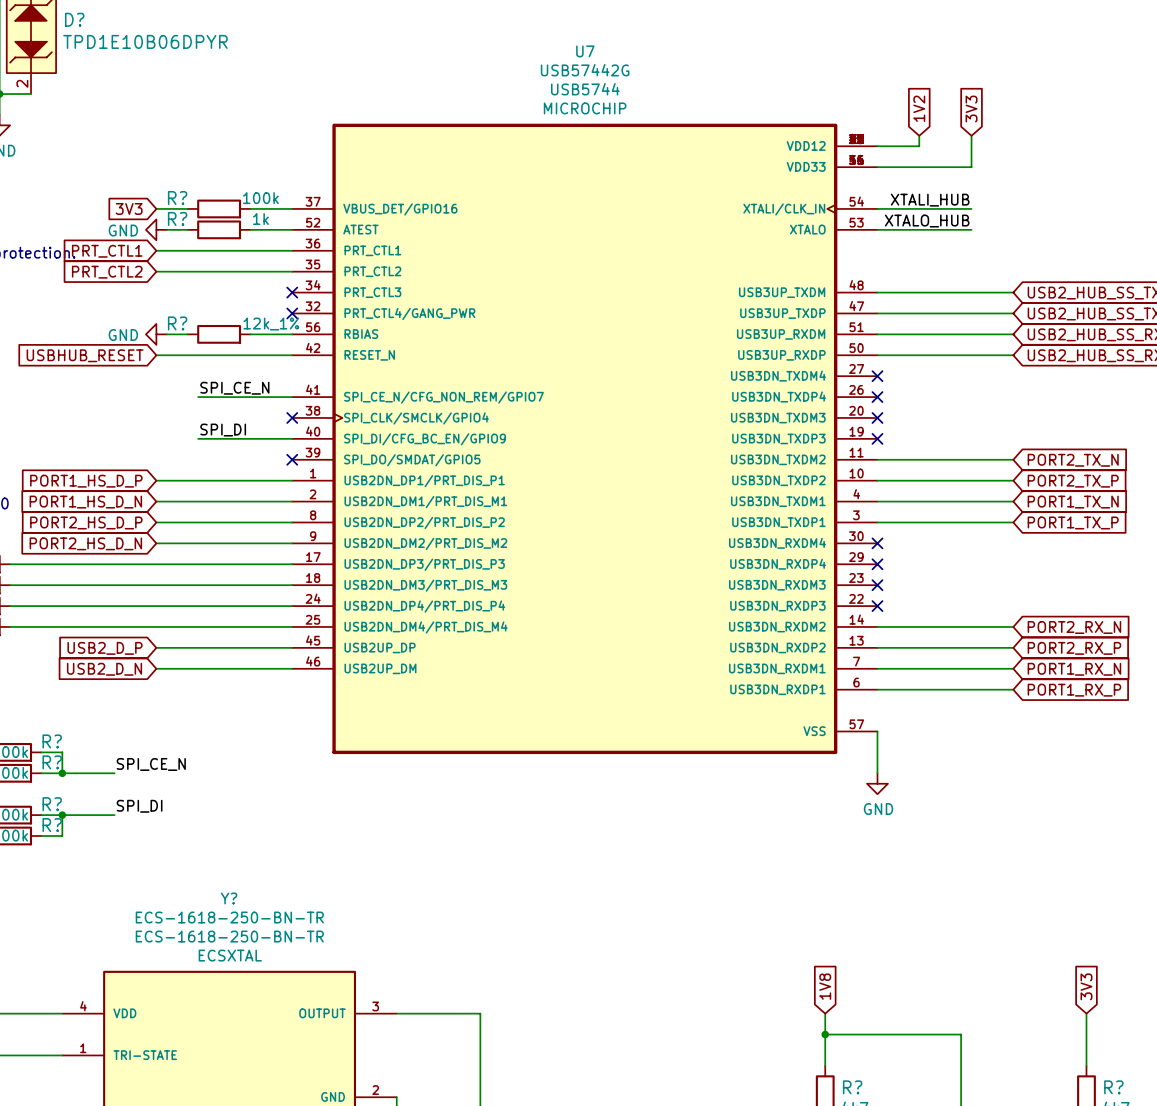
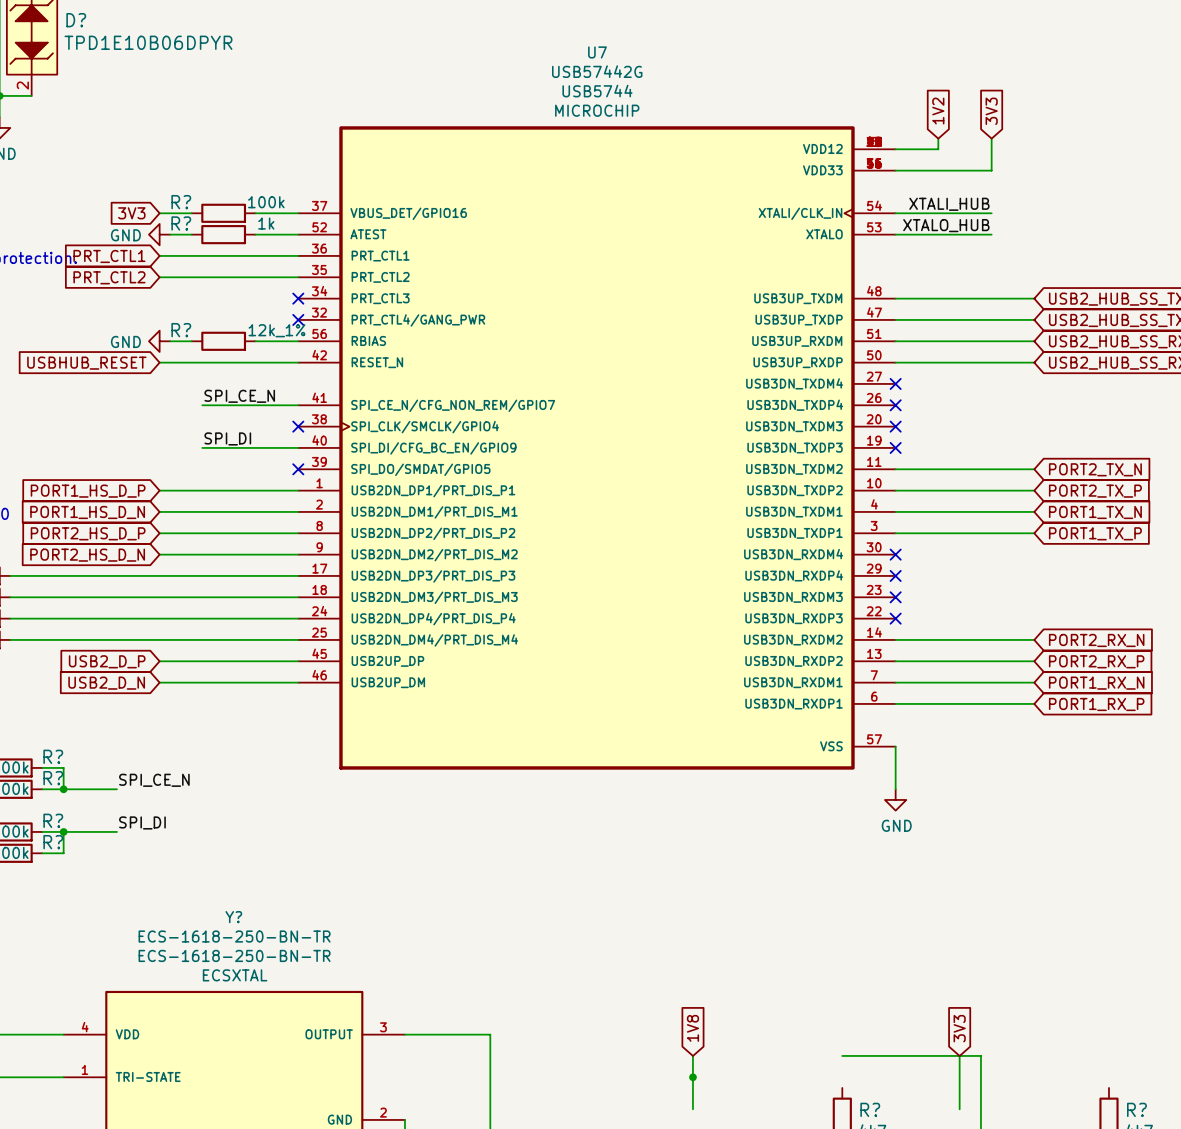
global label position: 1V8 (825, 986) -> 1V8 (692, 1028)
global label position: 3V3 (1086, 986) -> 3V3 (959, 1028)
wire: (825, 1013) (825, 1065) -> (692, 1055) (692, 1109)
wire: (1086, 1013) (1086, 1065) -> (959, 1055) (959, 1109)
junction: (825, 1034) -> none
junction: none -> (692, 1077)

